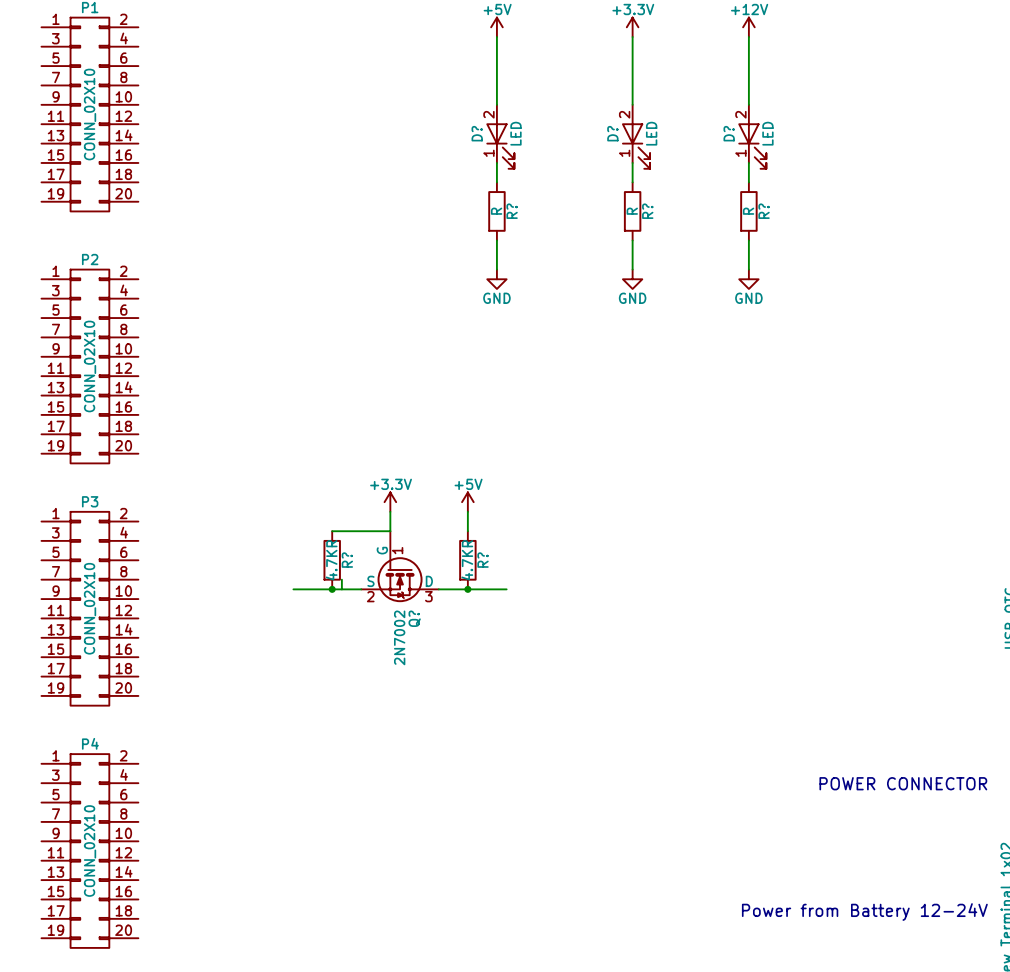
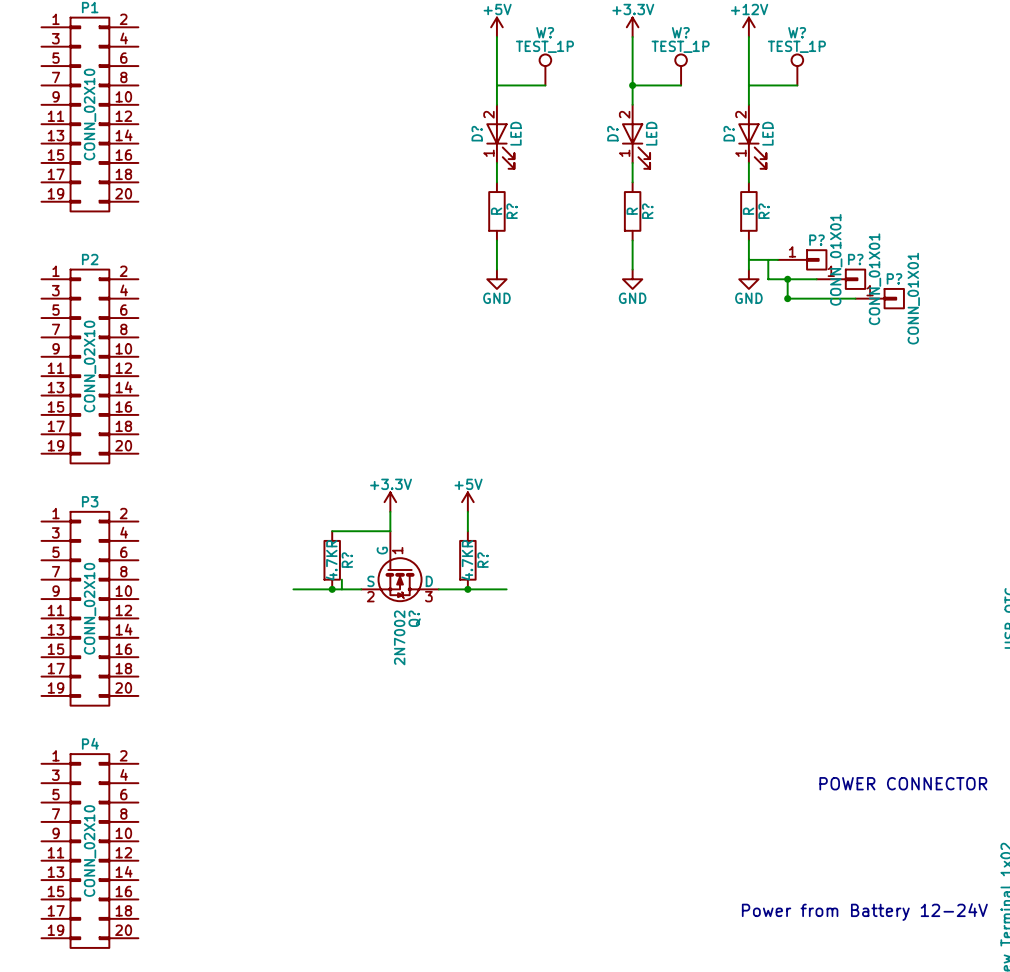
W?: none -> TEST_1P (545, 69)
W?: none -> TEST_1P (681, 69)
W?: none -> TEST_1P (797, 69)
wire: none -> (496, 85) (545, 85)
wire: none -> (632, 85) (681, 85)
junction: none -> (632, 85)
wire: none -> (748, 85) (797, 85)
wire: none -> (748, 259) (777, 259)
wire: none -> (768, 259) (768, 279) (816, 279)
P?: none -> CONN_01X01 (802, 259)
wire: none -> (787, 279) (787, 298) (855, 298)
junction: none -> (787, 279)
P?: none -> CONN_01X01 (840, 279)
junction: none -> (787, 298)
P?: none -> CONN_01X01 (879, 298)

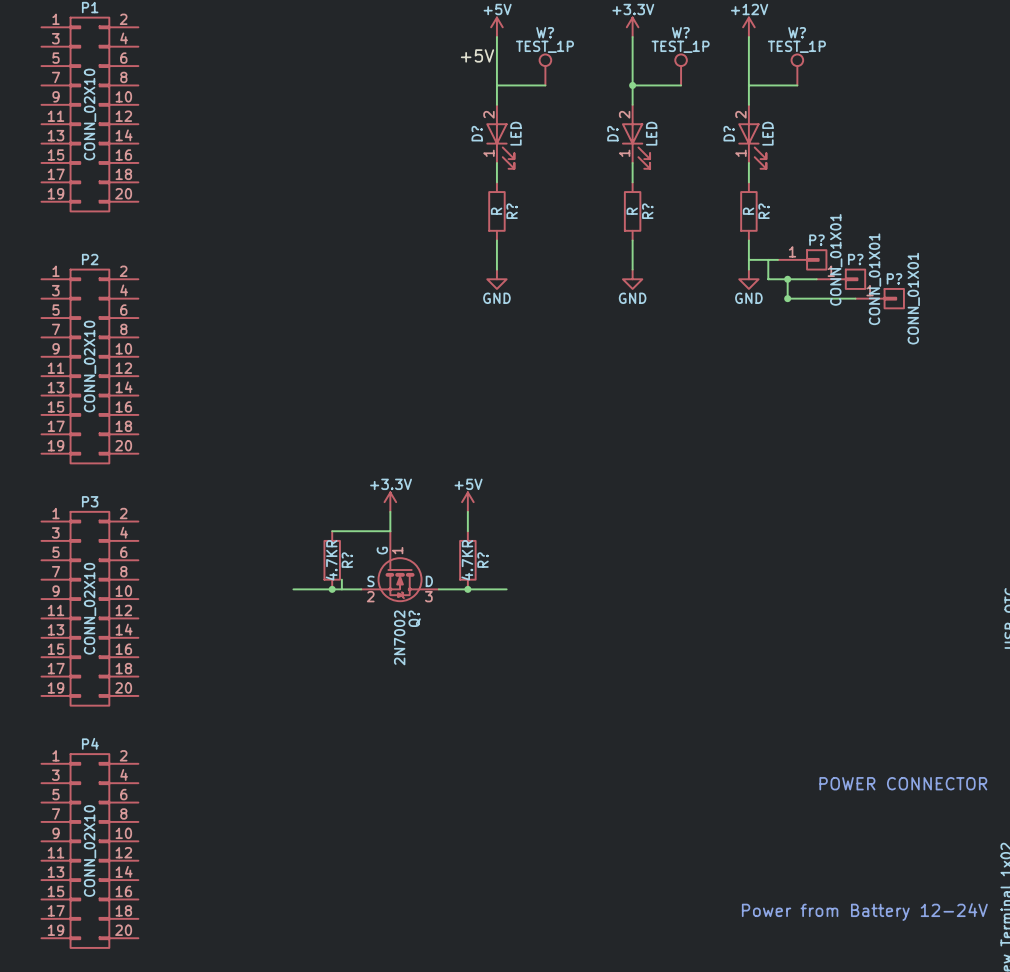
label: none -> +5V (477, 55)

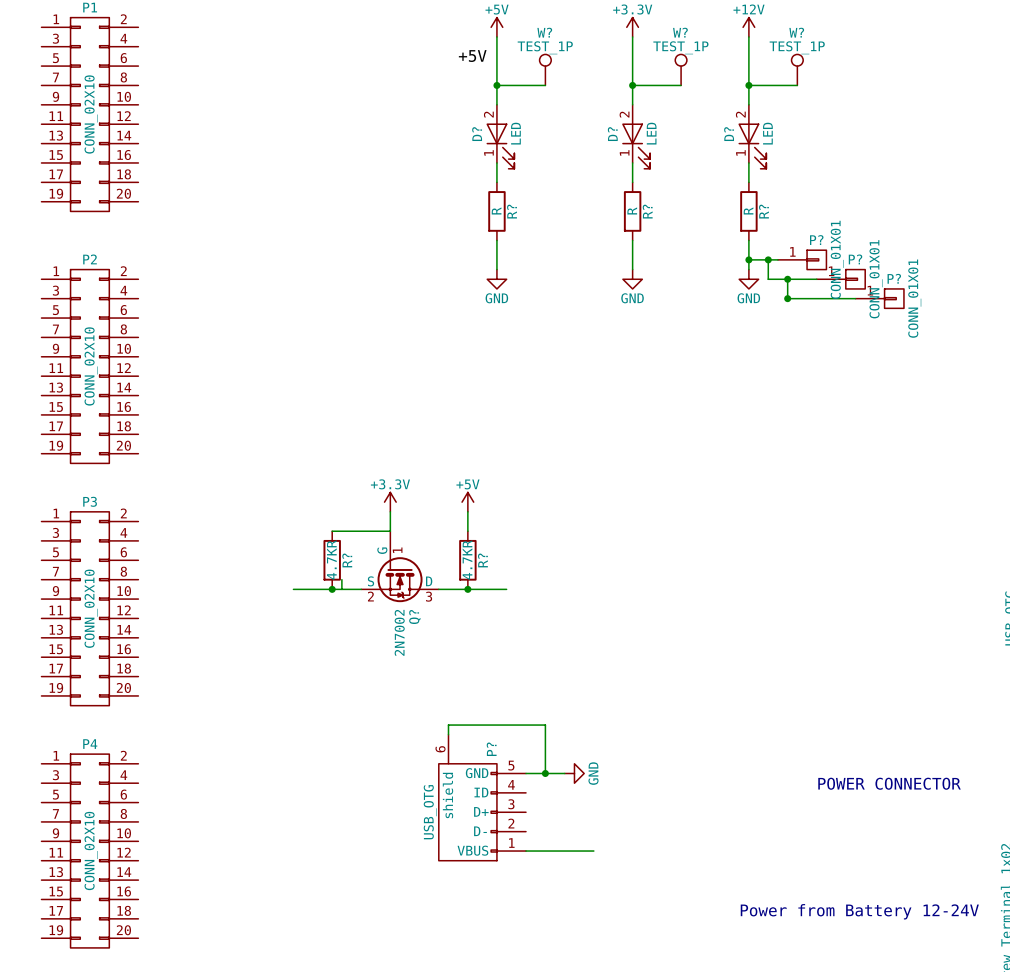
junction: none -> (496, 85)
junction: none -> (748, 85)
junction: none -> (748, 259)
junction: none -> (768, 259)
wire: none -> (448, 734) (448, 725) (545, 725) (545, 773)
wire: none -> (526, 773) (564, 773)
junction: none -> (545, 773)
power symbol: none -> GND (574, 773)
P?: none -> USB_OTG (482, 797)
wire: none -> (526, 851) (593, 851)

